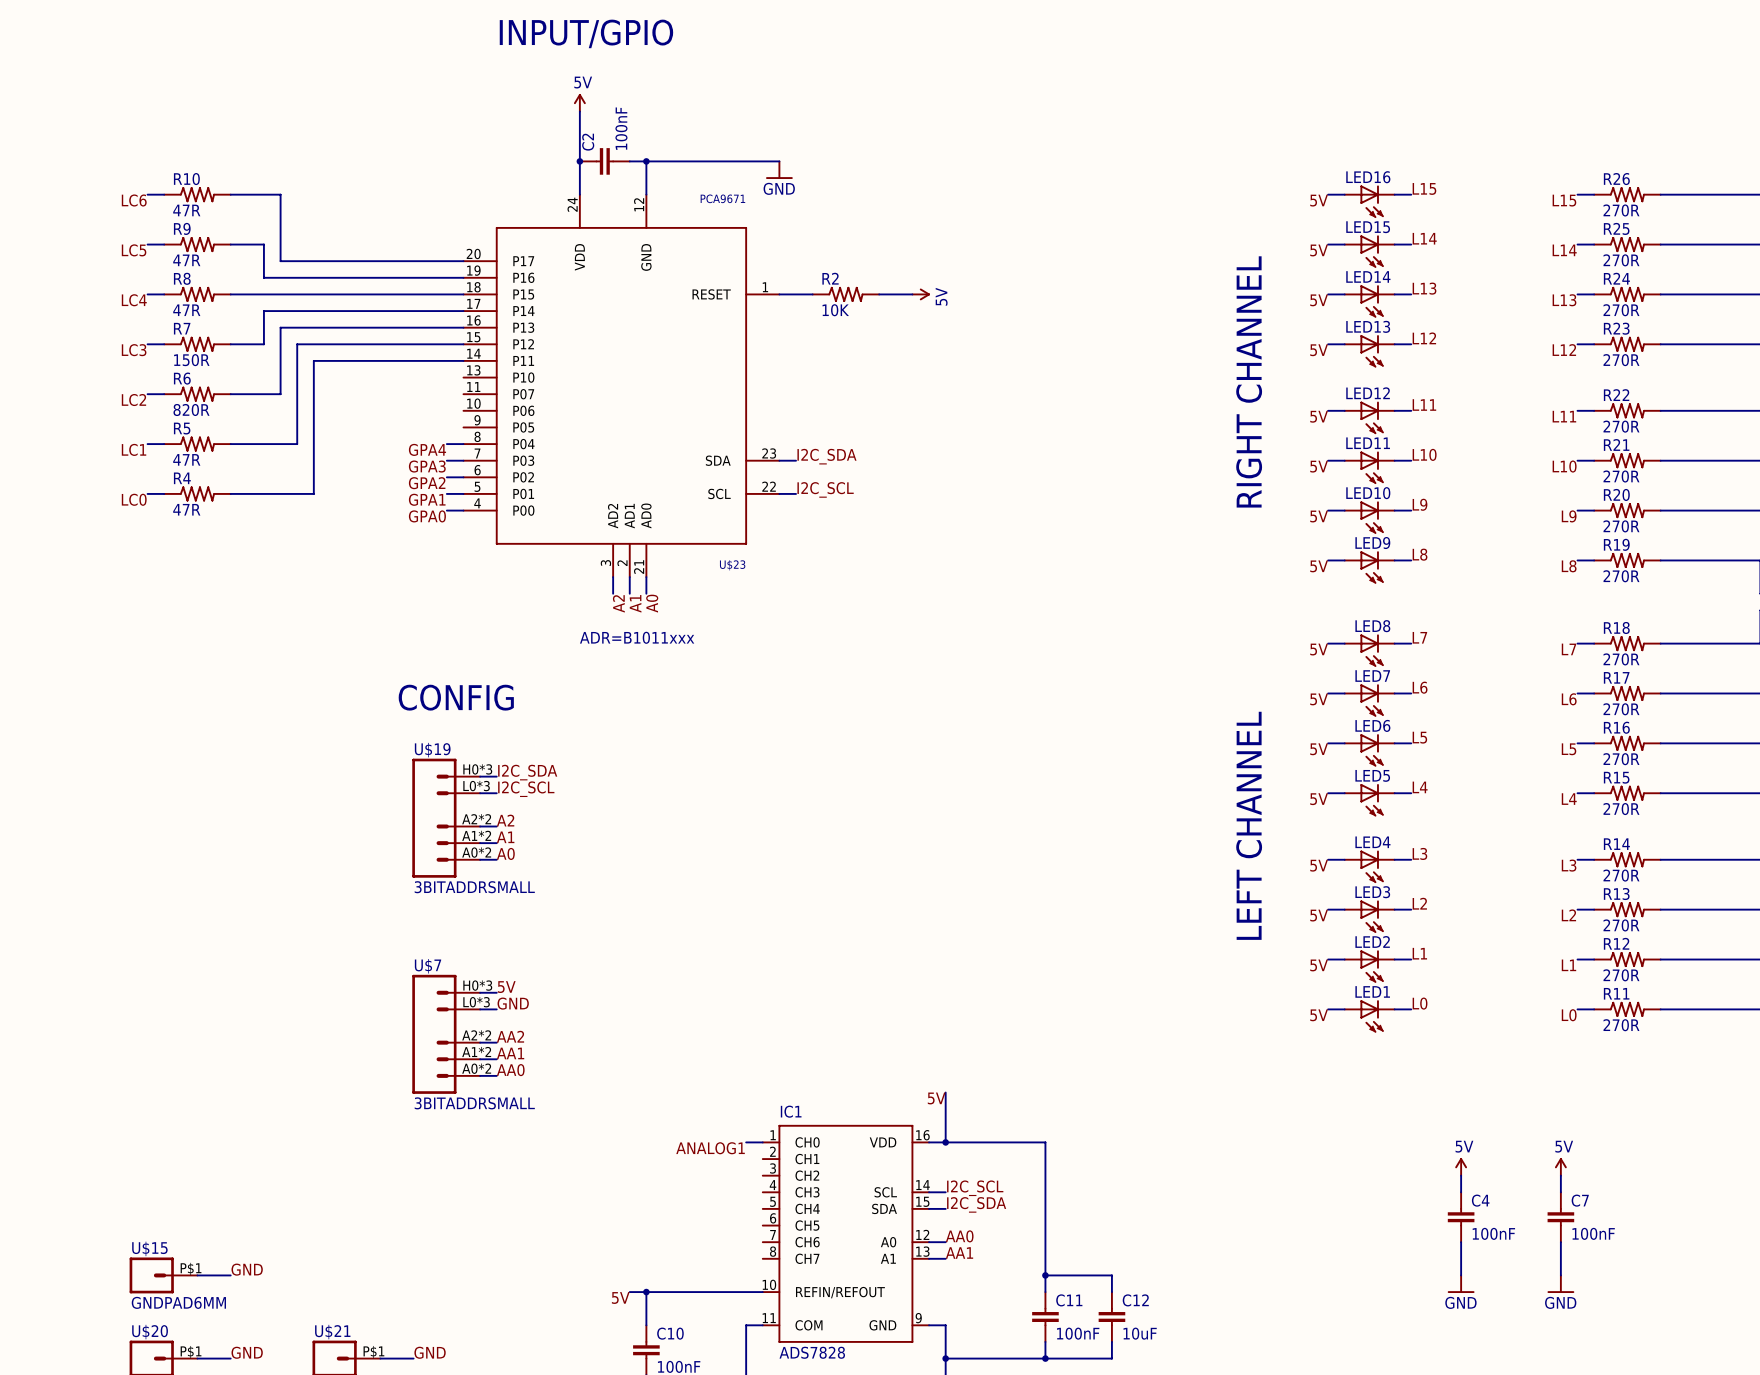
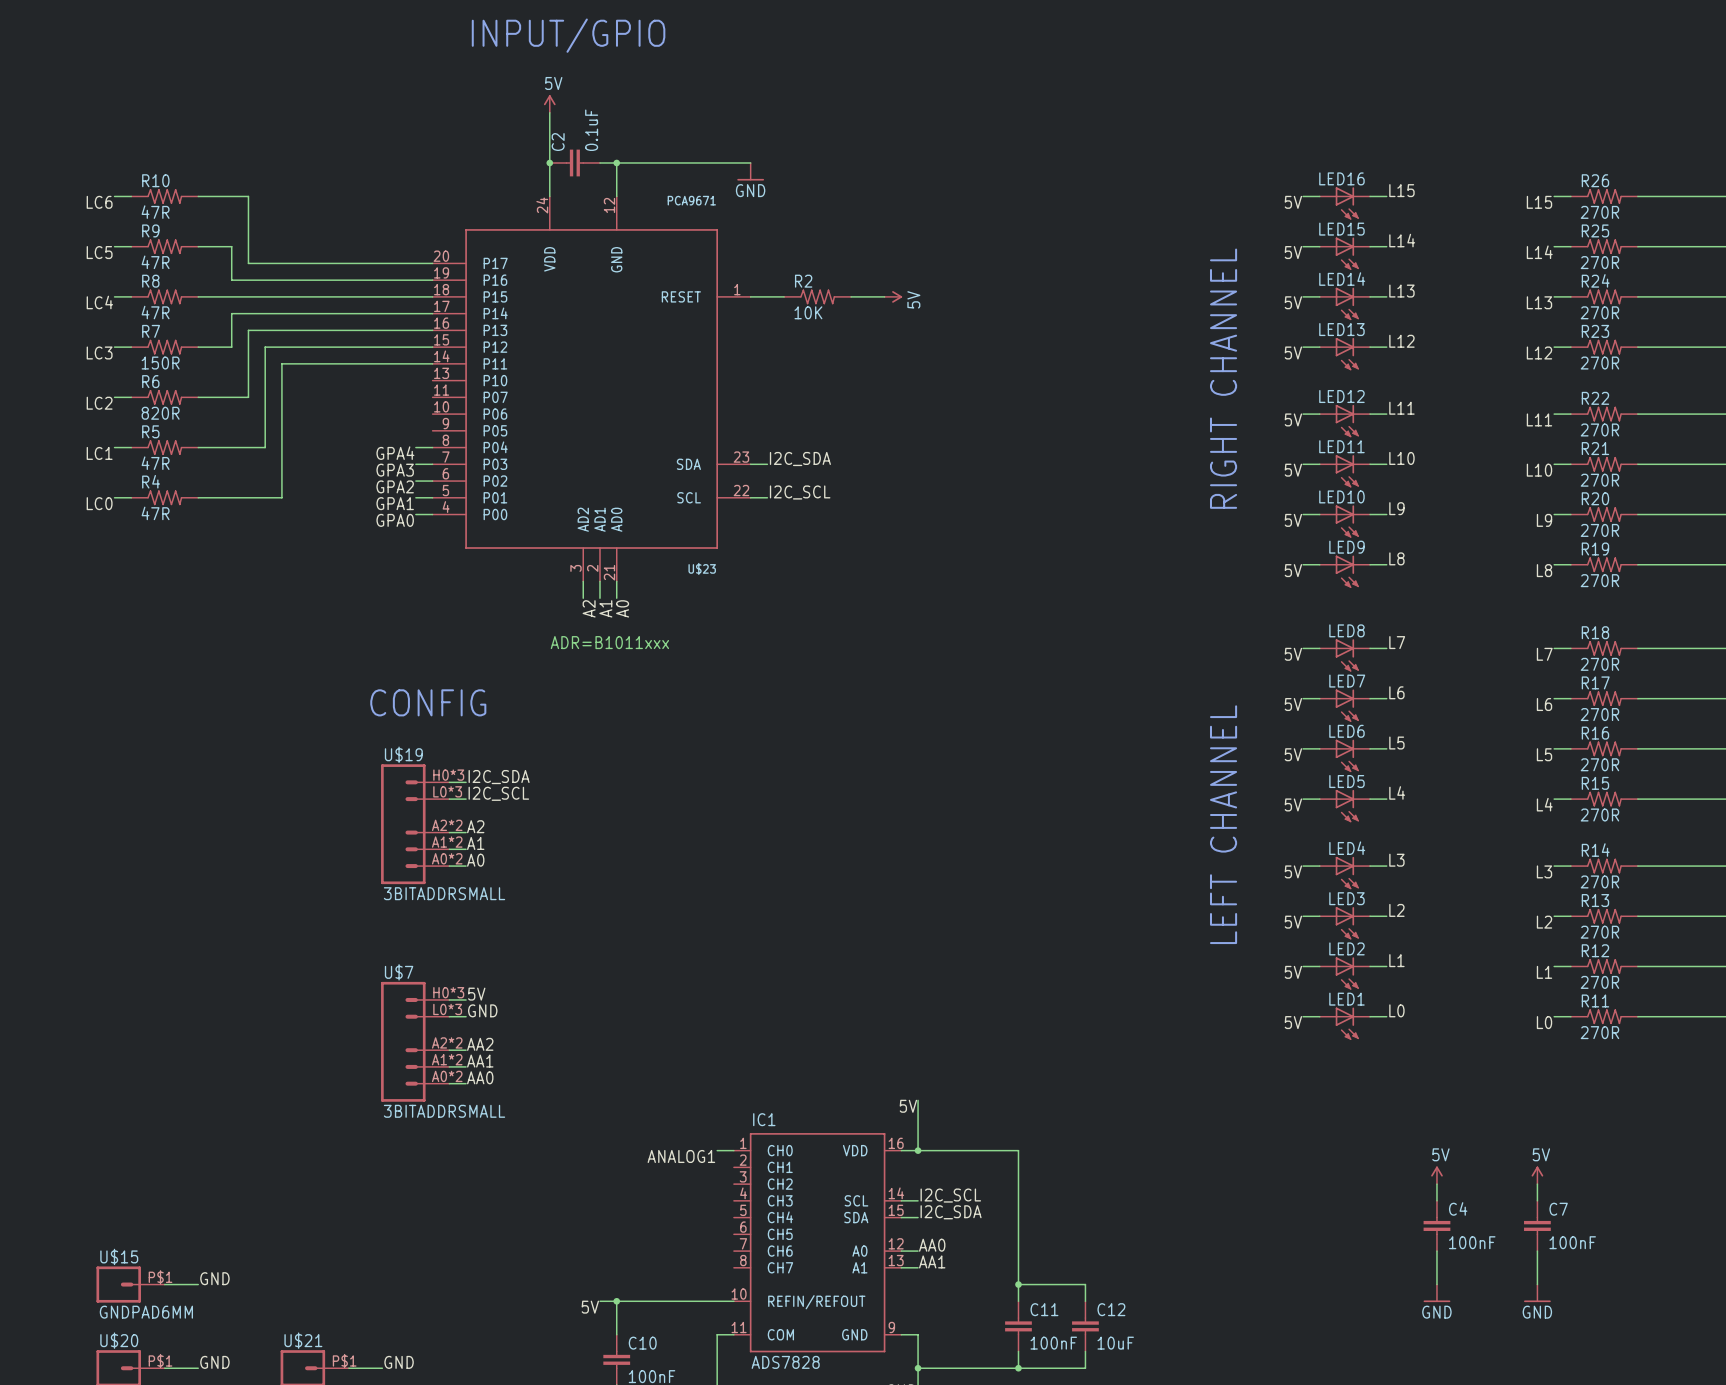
C2 value: 100nF (621, 128) -> 0.1uF (591, 130)

